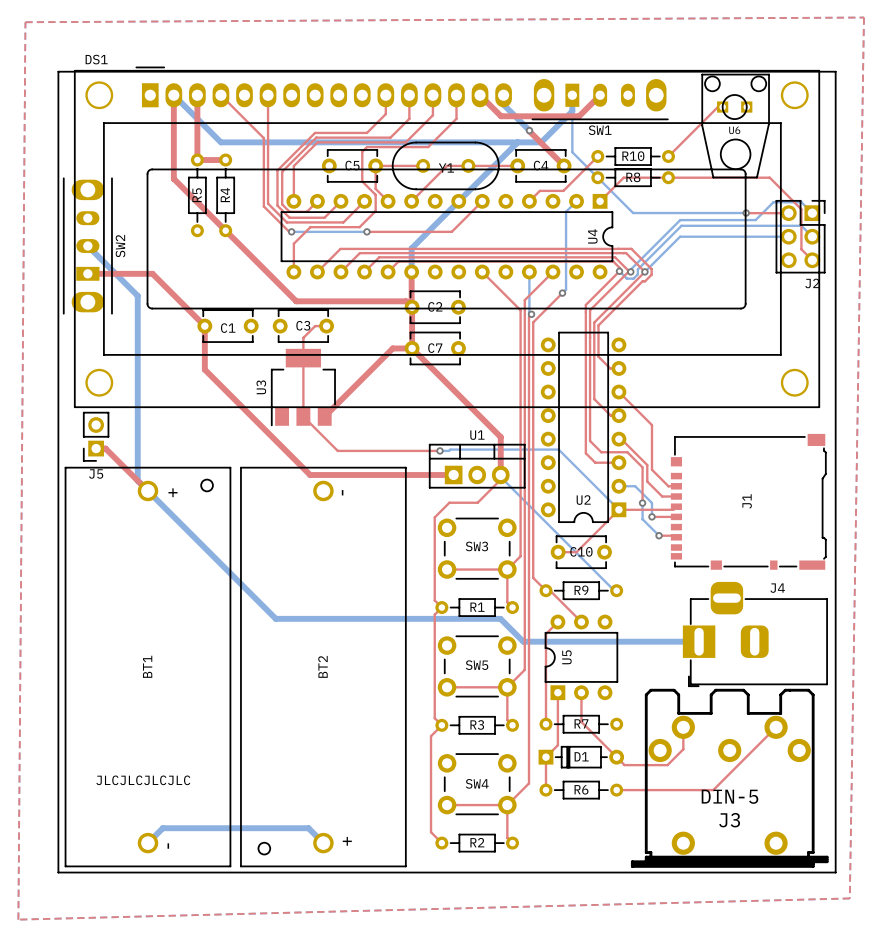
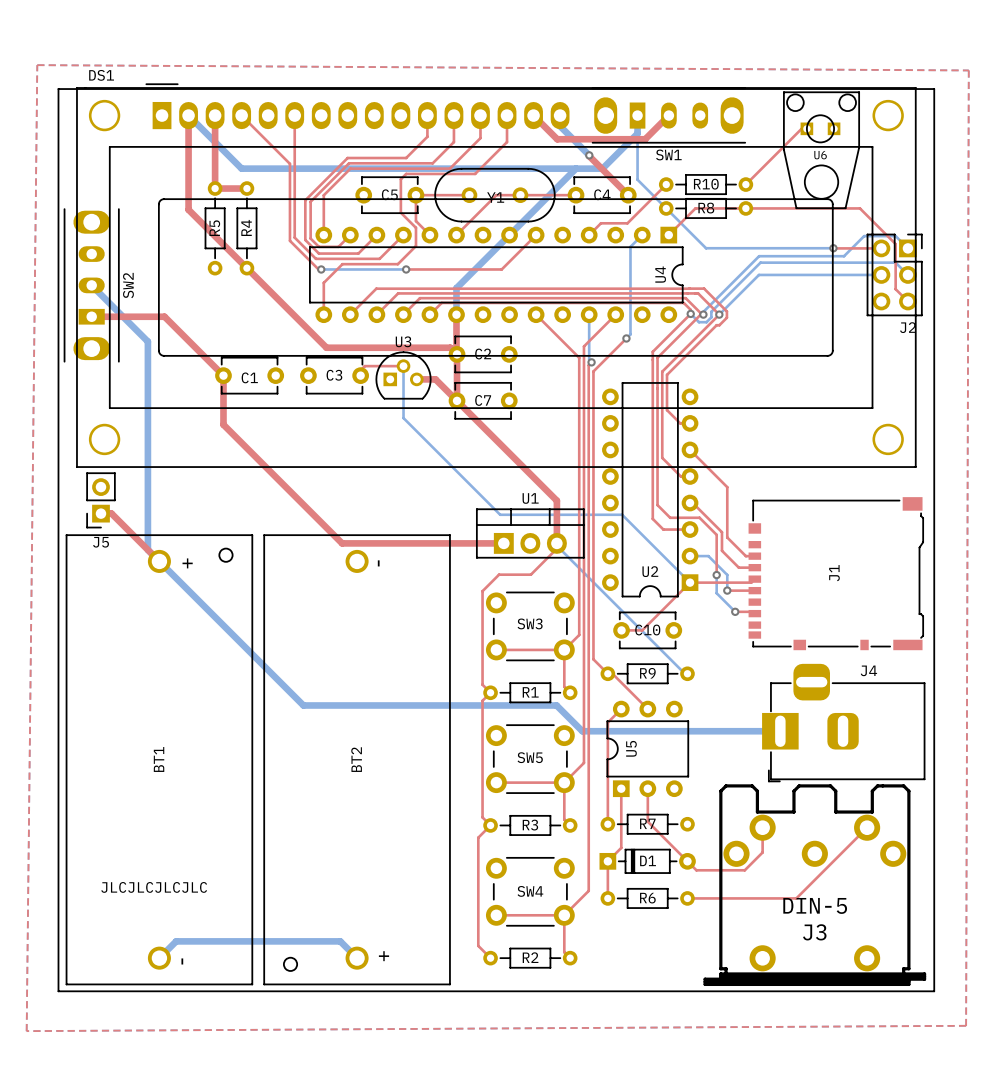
top zone outline: (863, 17) (25, 22) (18, 919) (849, 898) (863, 17) -> (37, 65) (26, 1031) (966, 1025) (968, 70) (37, 65)
top track: none -> (403, 366) (364, 366) (355, 375)
top track: (326, 326) (315, 326) (303, 337) (303, 416) (337, 450) (440, 450) -> none
U3 footprint: [271, 348, 336, 426] -> [375, 351, 432, 400]
top track: (412, 348) (392, 348) (324, 416) -> (457, 400) (435, 379) (416, 379)
U3 name position: U3 (261, 387) -> U3 (403, 341)
bottom track: (450, 449) (440, 450) -> (500, 514) (403, 418) (403, 366)
via: (440, 450) -> none

